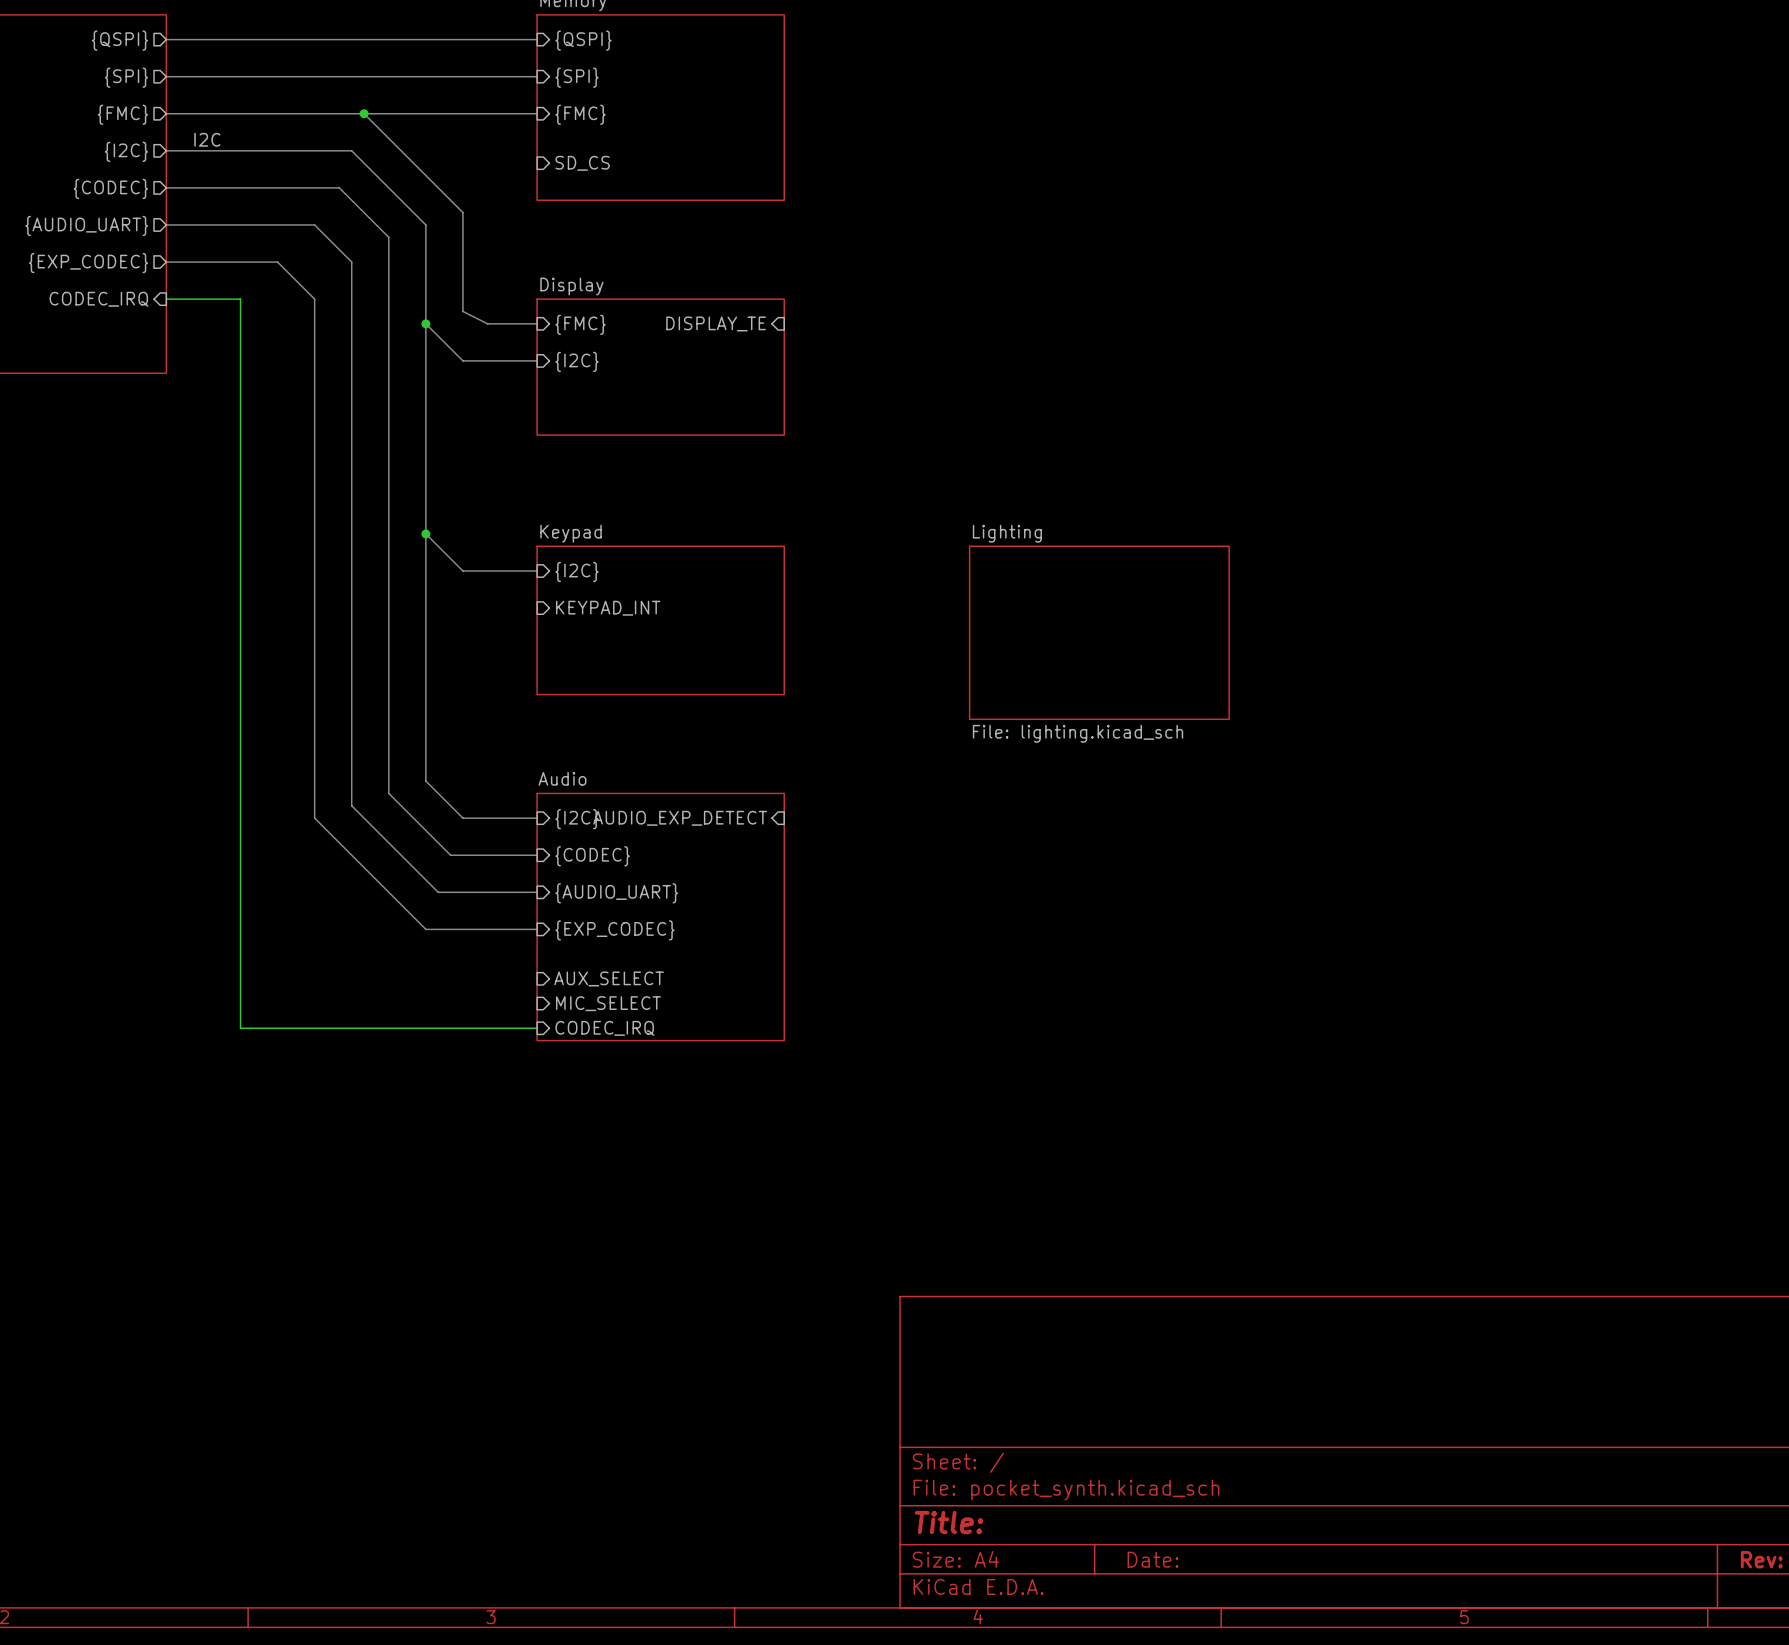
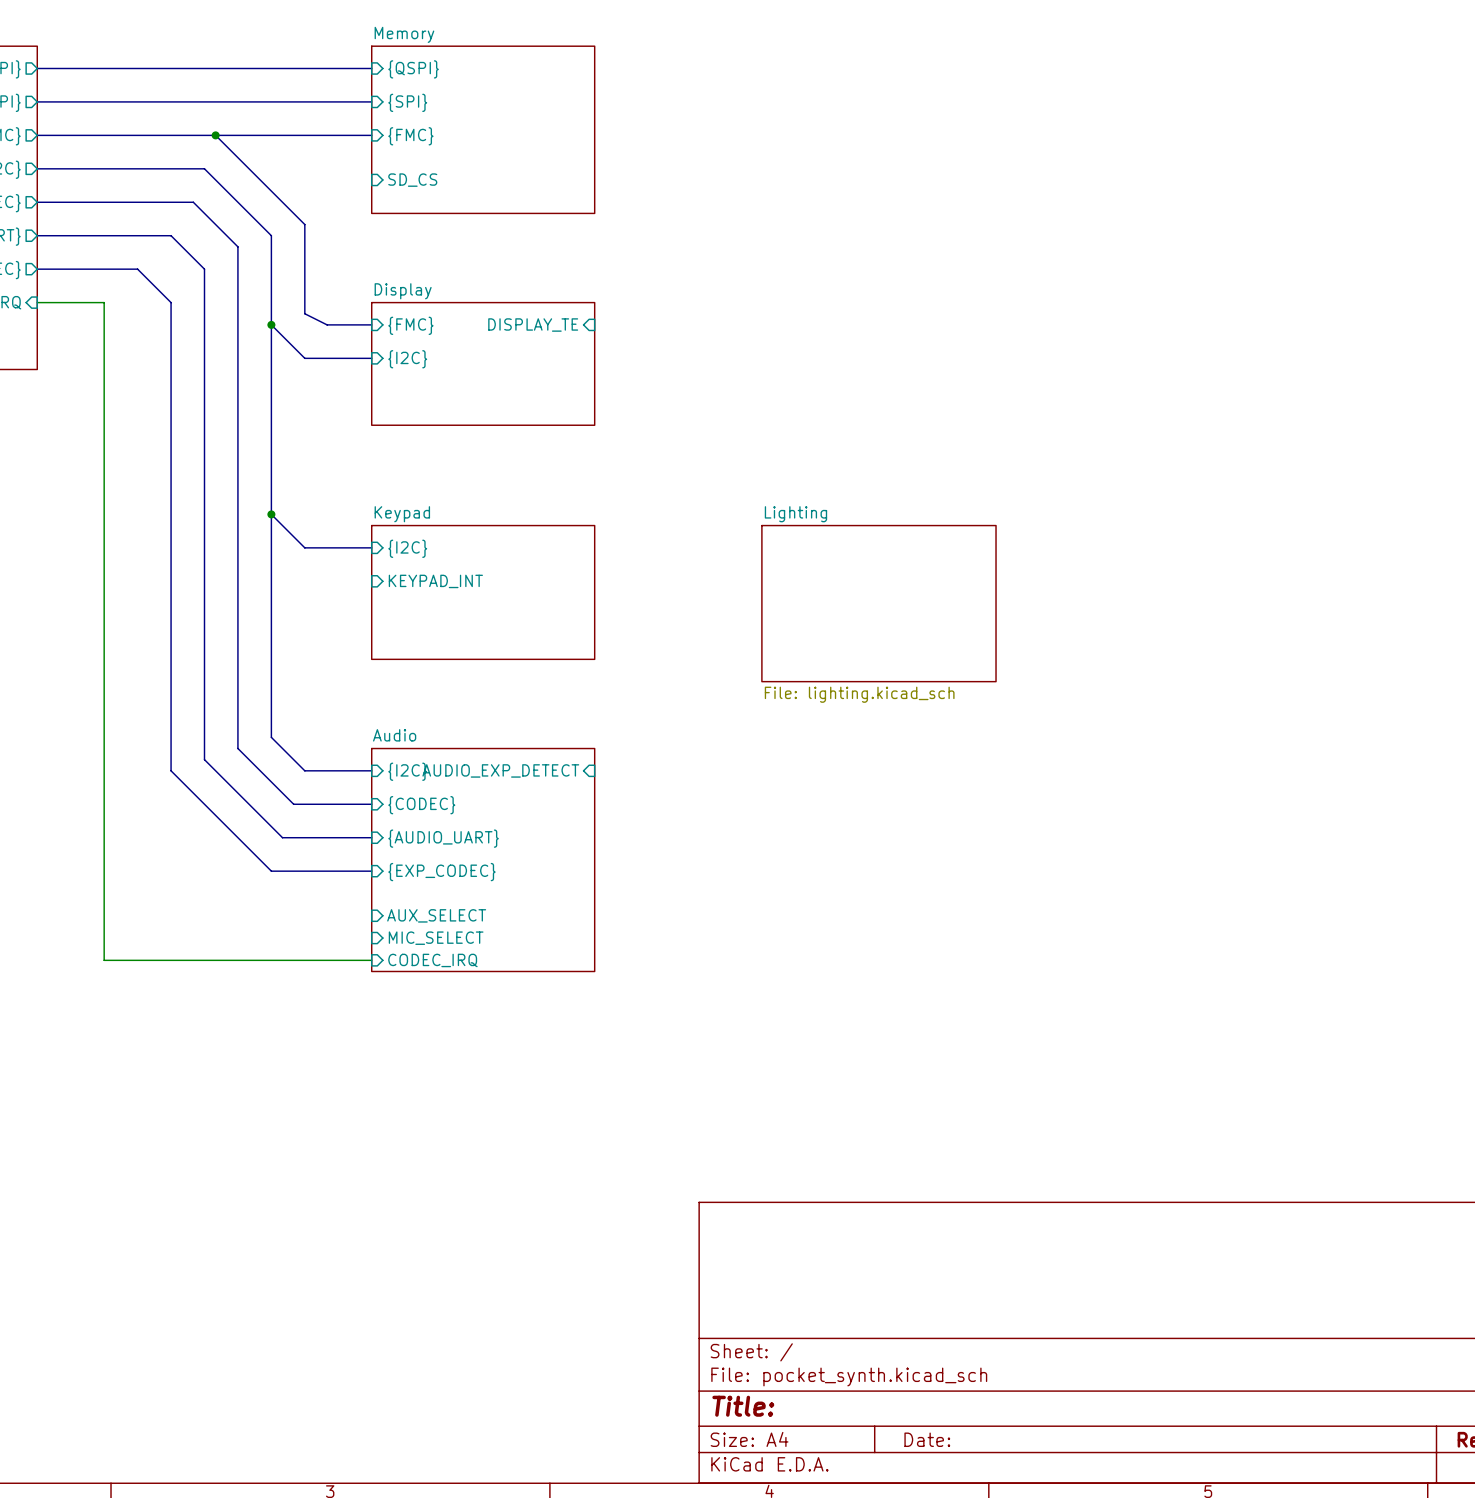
label: I2C (207, 139) -> none

